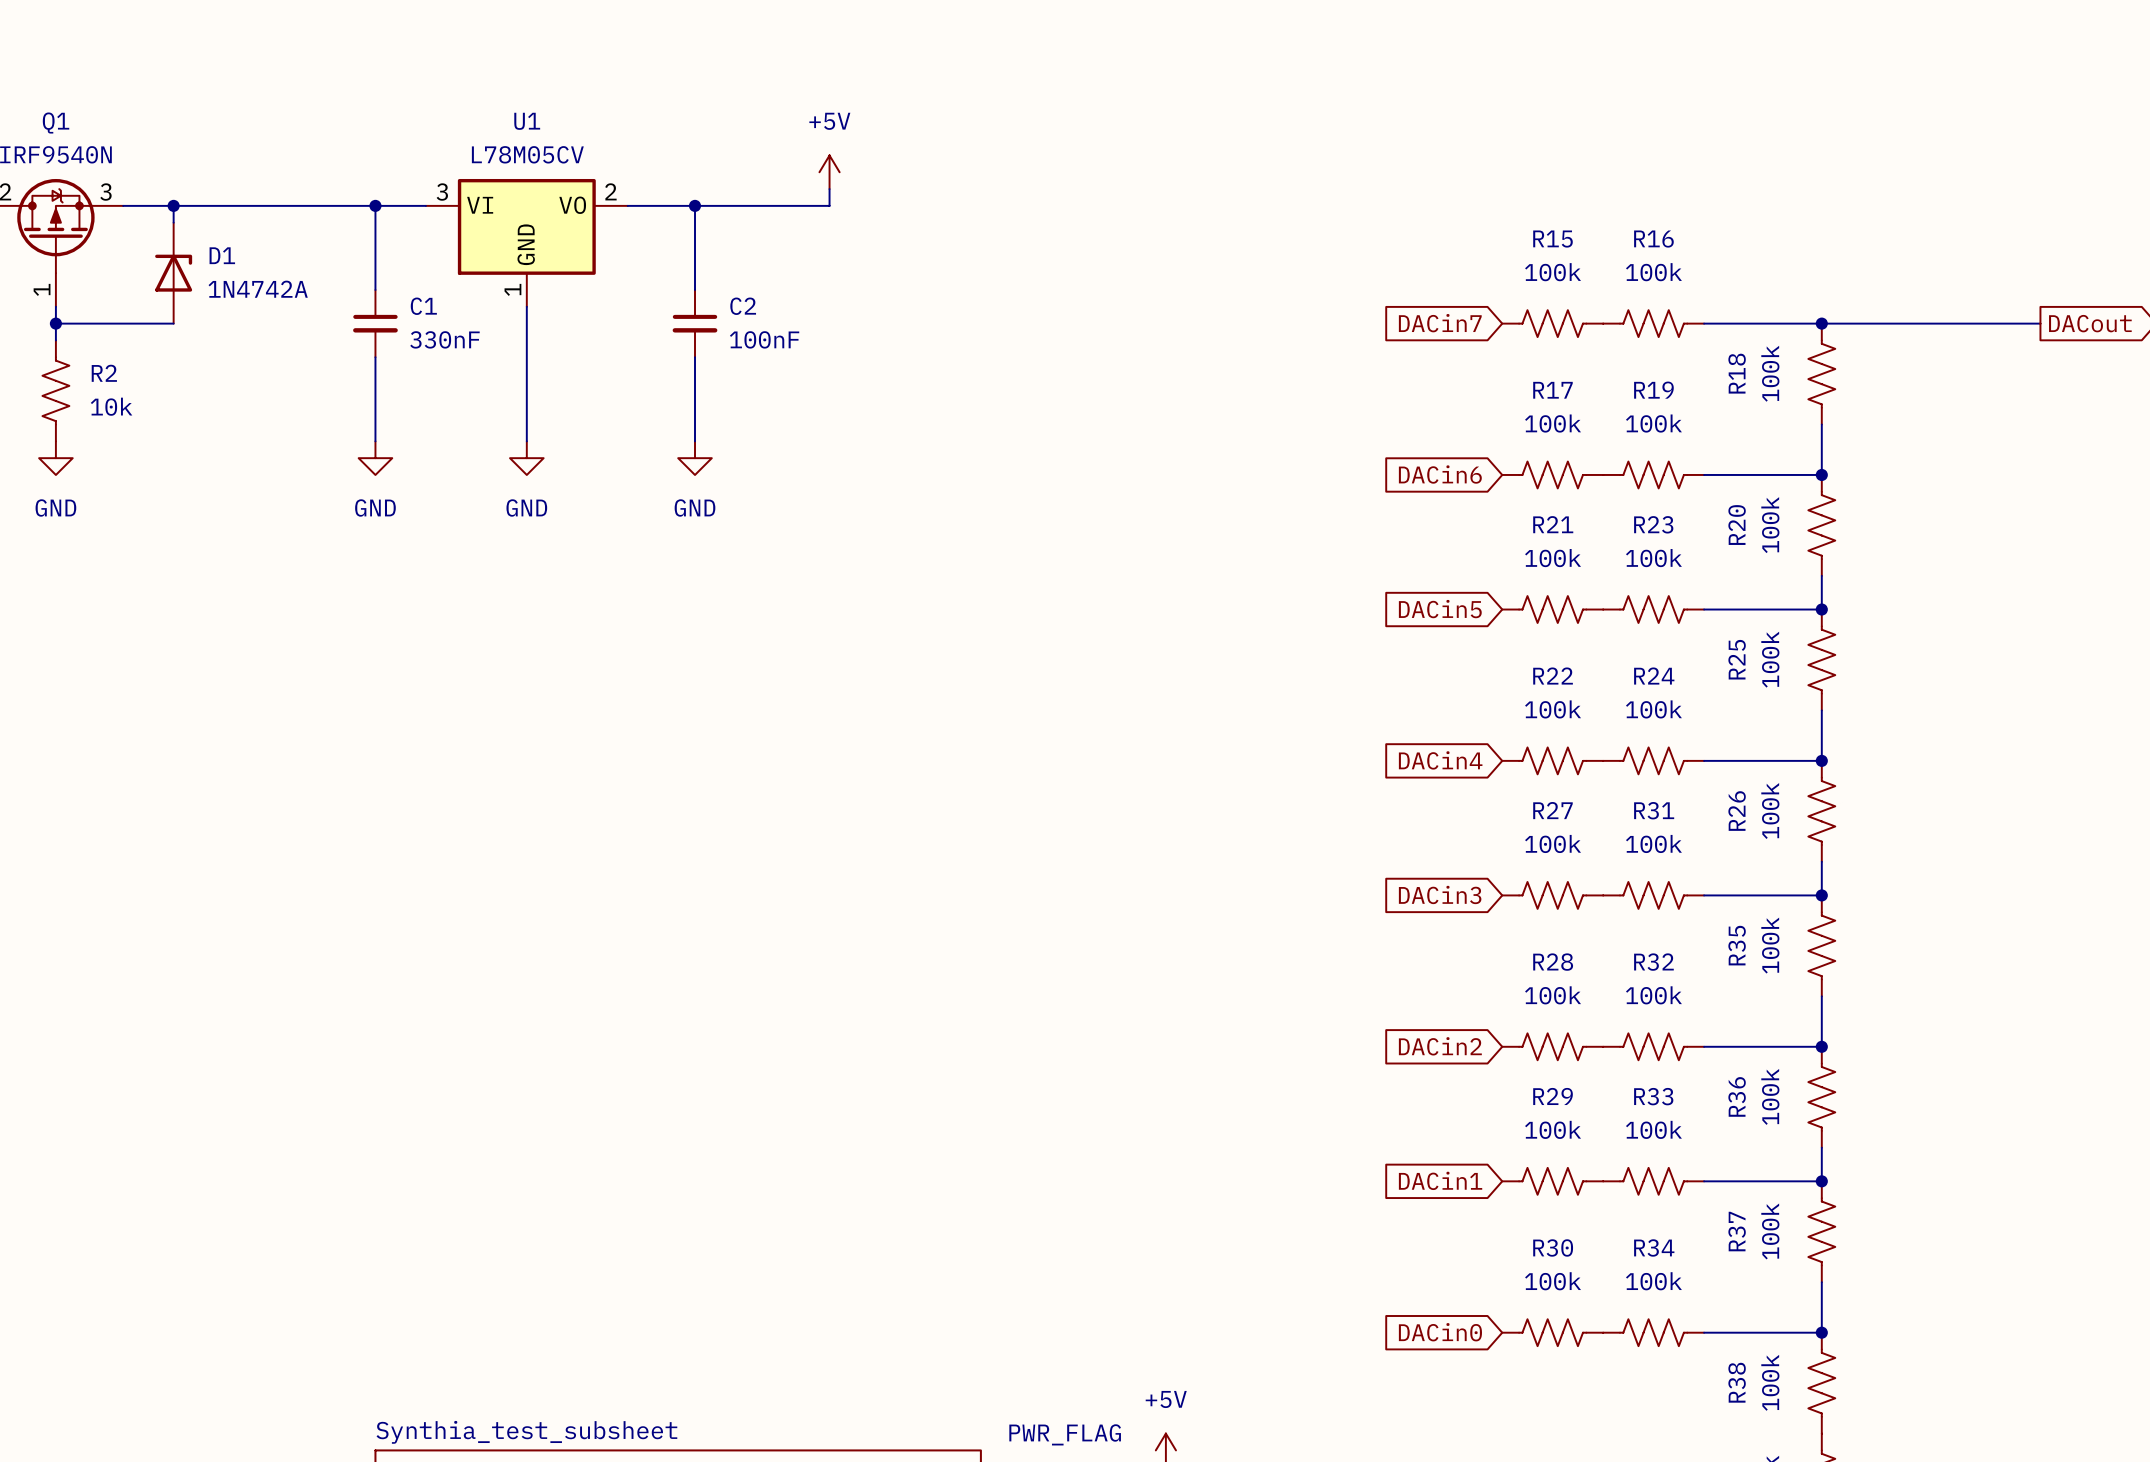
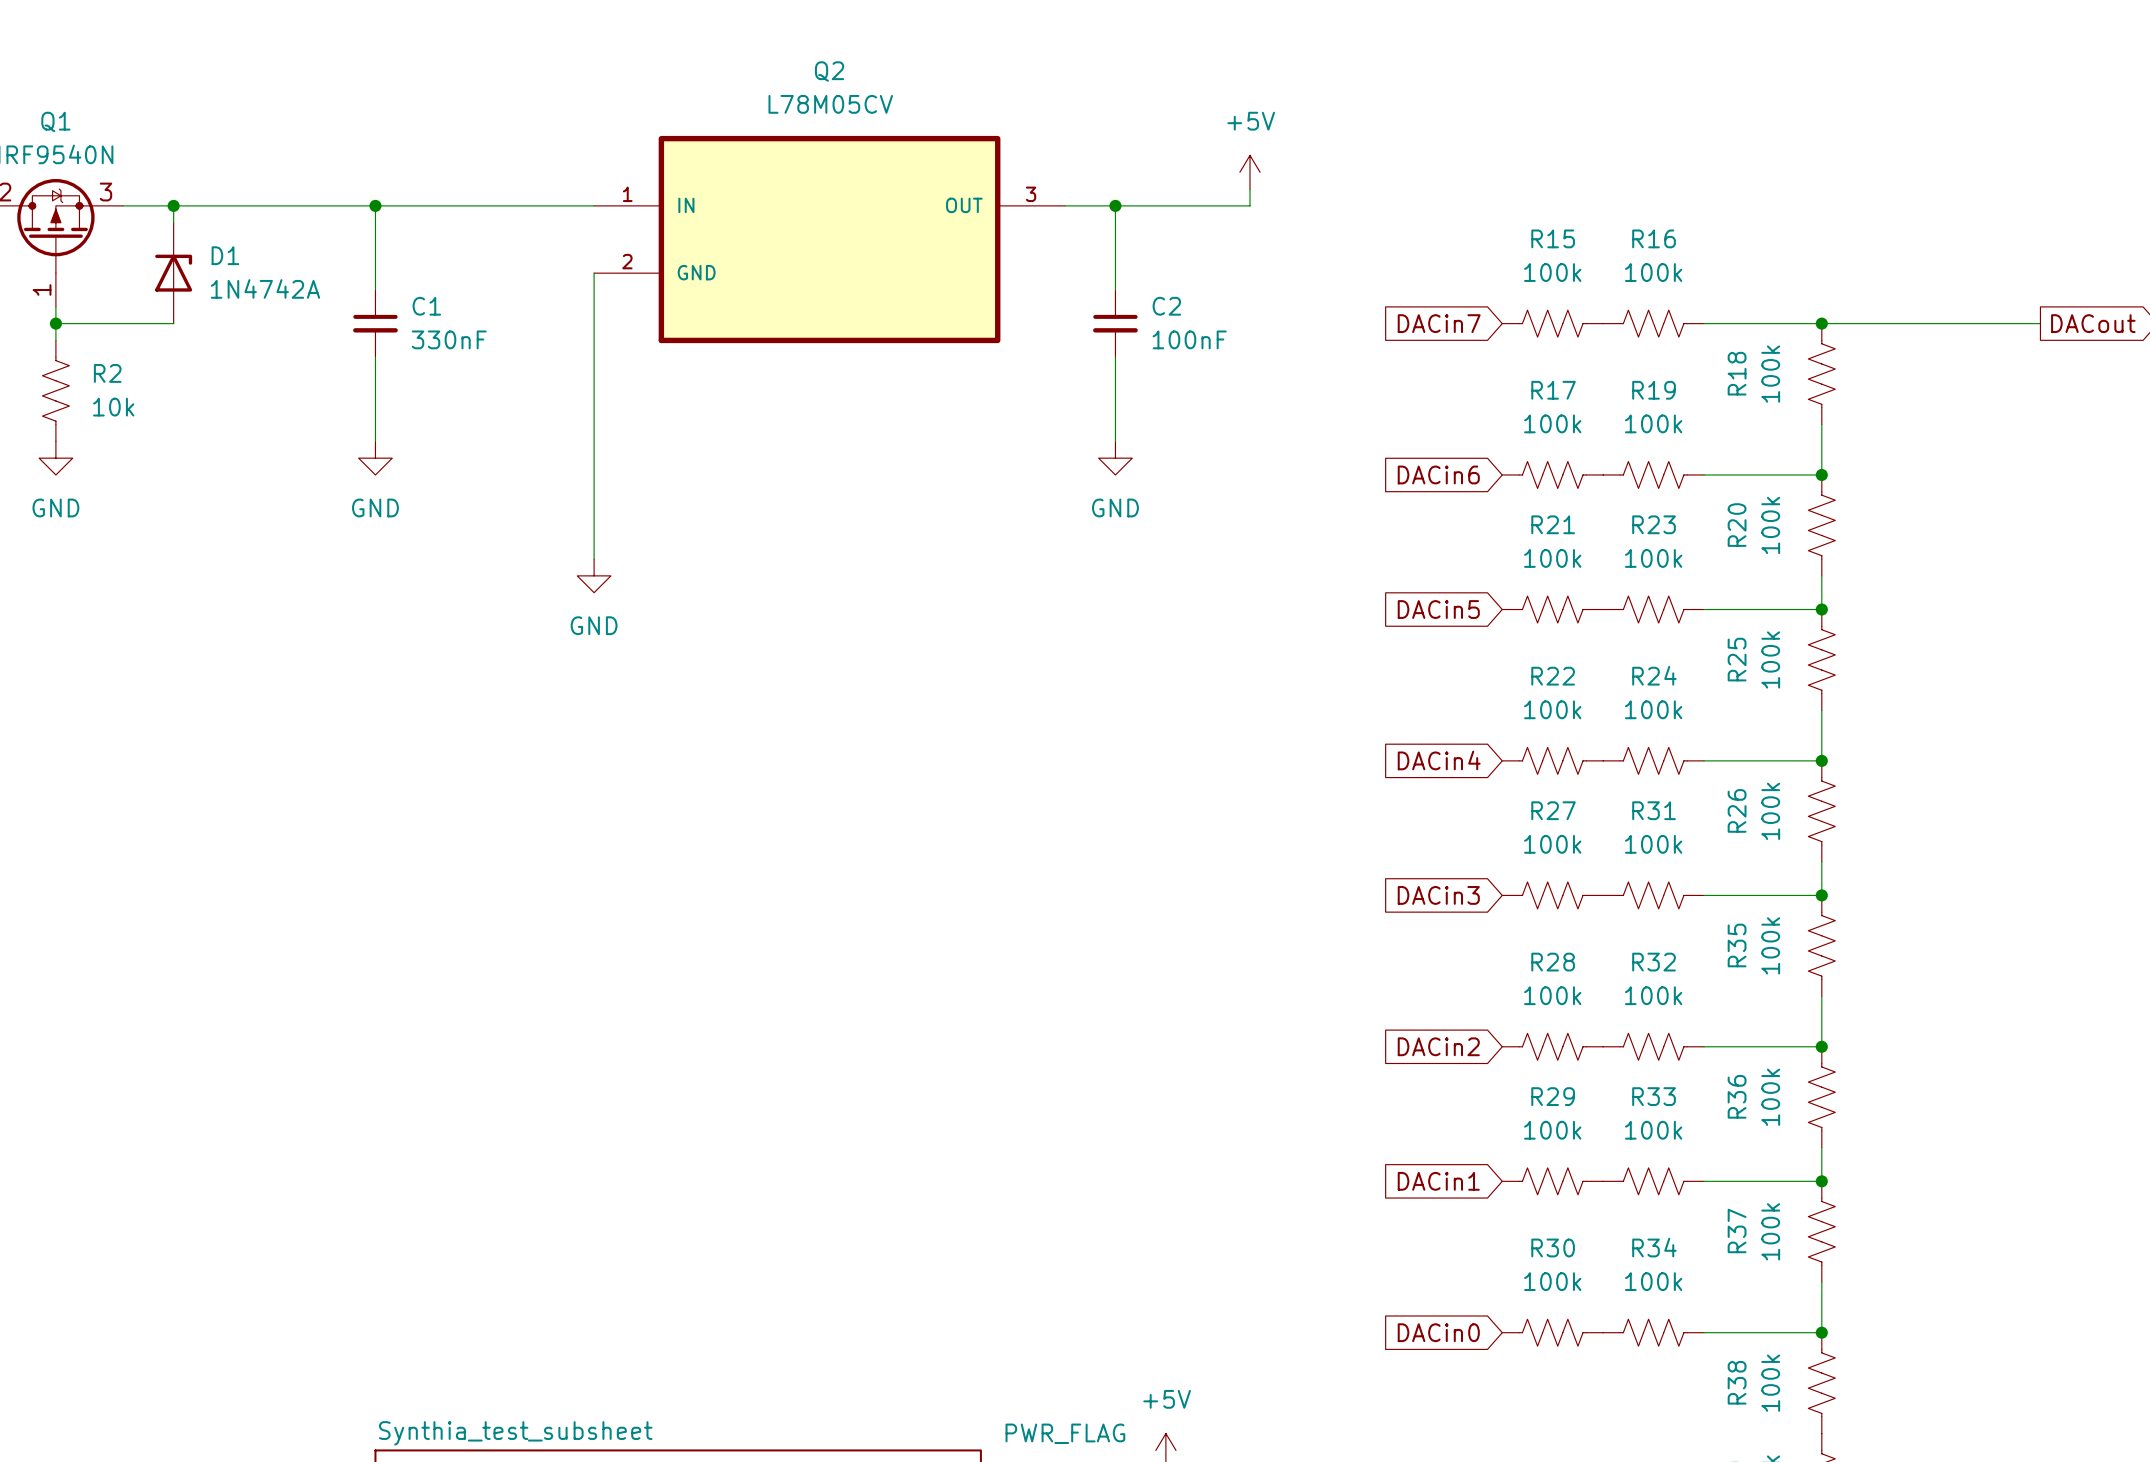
power symbol: +5V (829, 172) -> none
power symbol: none -> +5V (1249, 172)
wire: none -> (1249, 189) (1249, 205) (1064, 205)
junction: (695, 205) -> none
wire: none -> (1115, 205) (1115, 289)
junction: none -> (1115, 205)
Q2: none -> L78M05CV (829, 239)
U1: L78M05CV (526, 242) -> none
wire: none -> (594, 273) (594, 559)
wire: (526, 306) (526, 441) -> none
C2 position: (695, 323) -> (1115, 323)
wire: (695, 357) (695, 441) -> none
wire: none -> (1115, 357) (1115, 441)
power symbol: GND (526, 458) -> none
power symbol: GND (695, 458) -> none
power symbol: none -> GND (1115, 458)
power symbol: none -> GND (594, 575)

